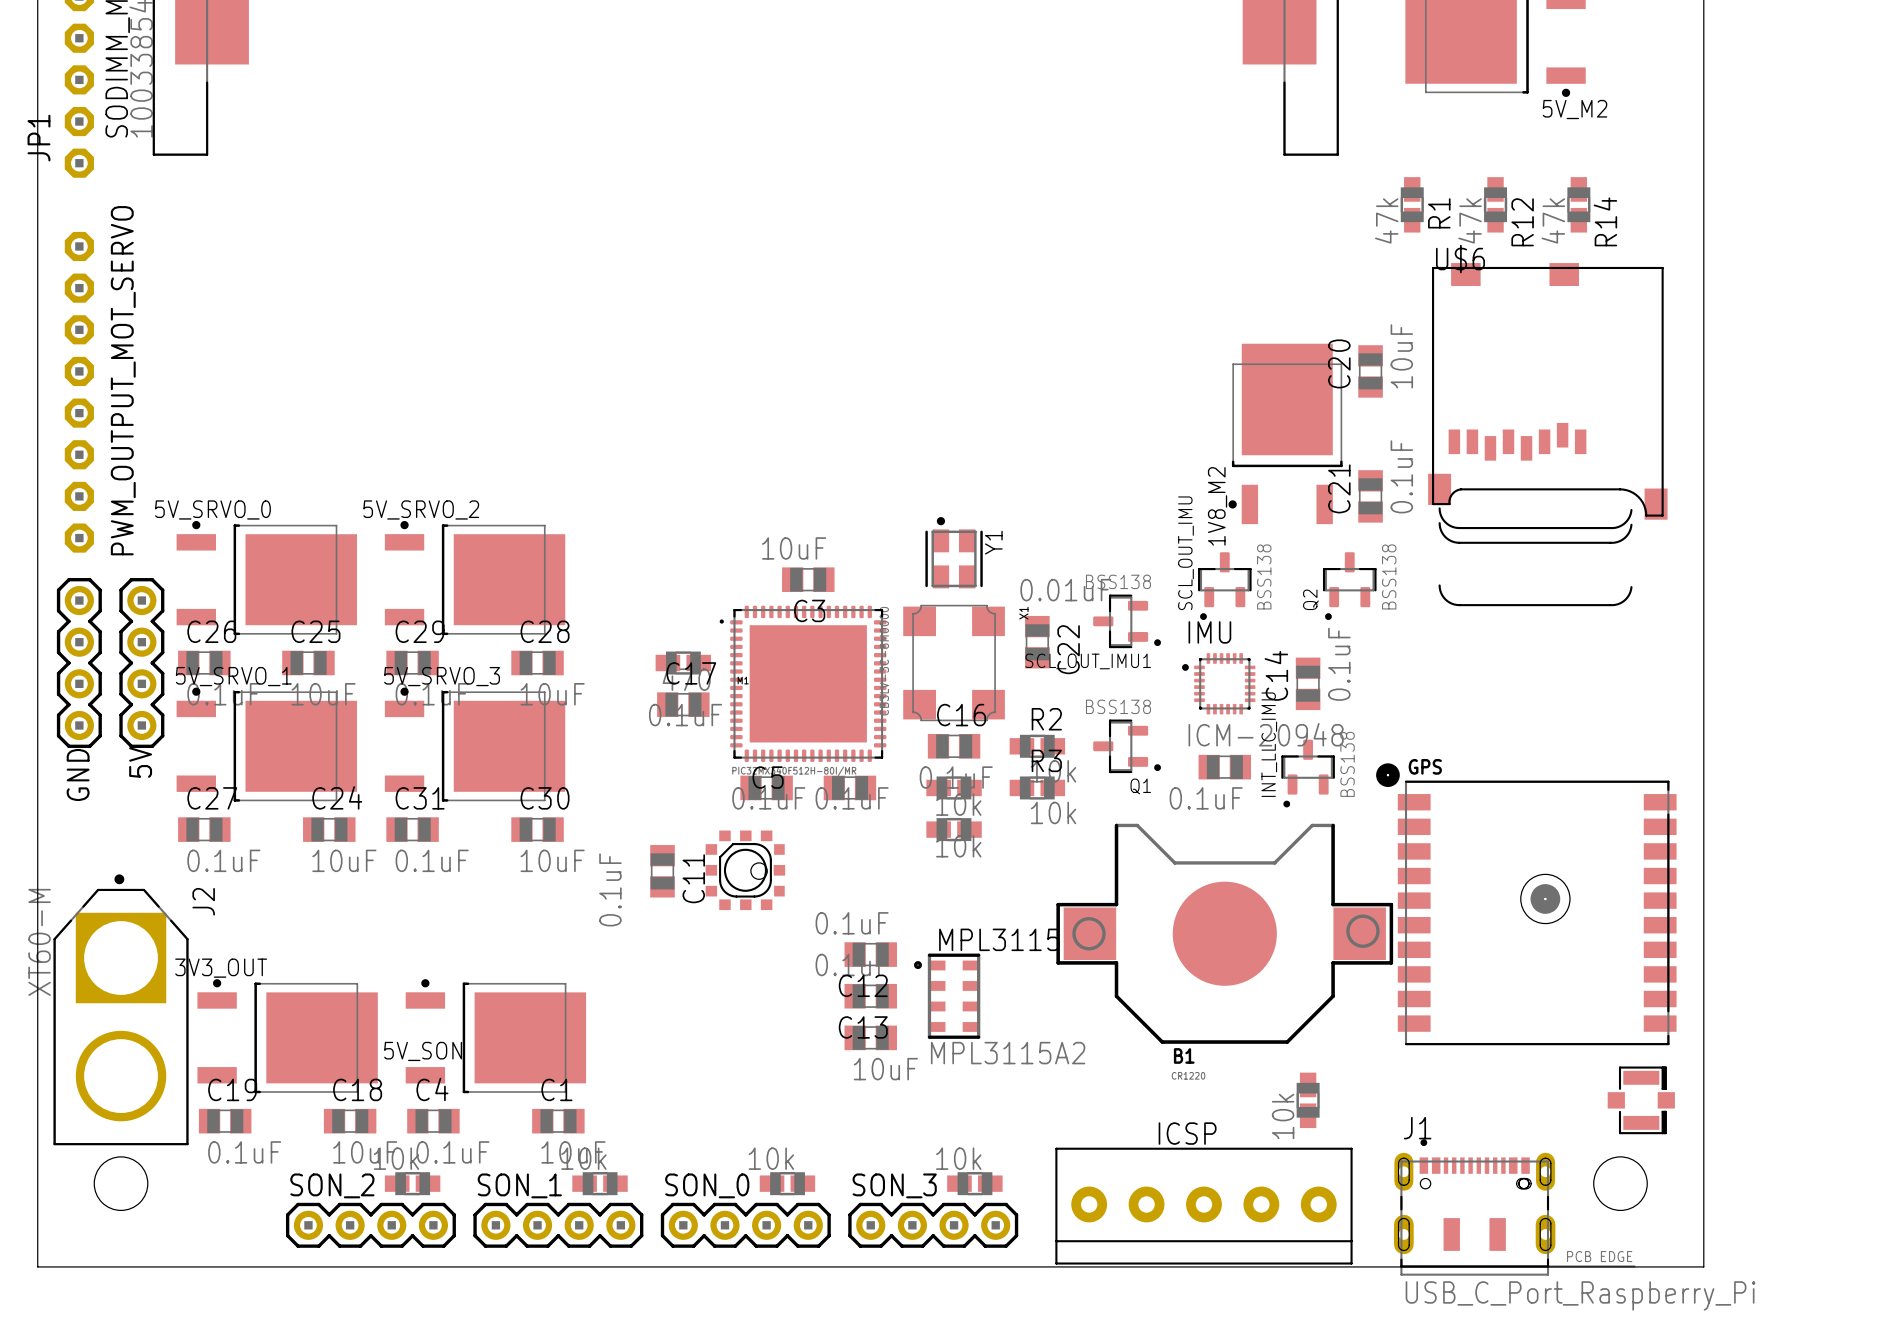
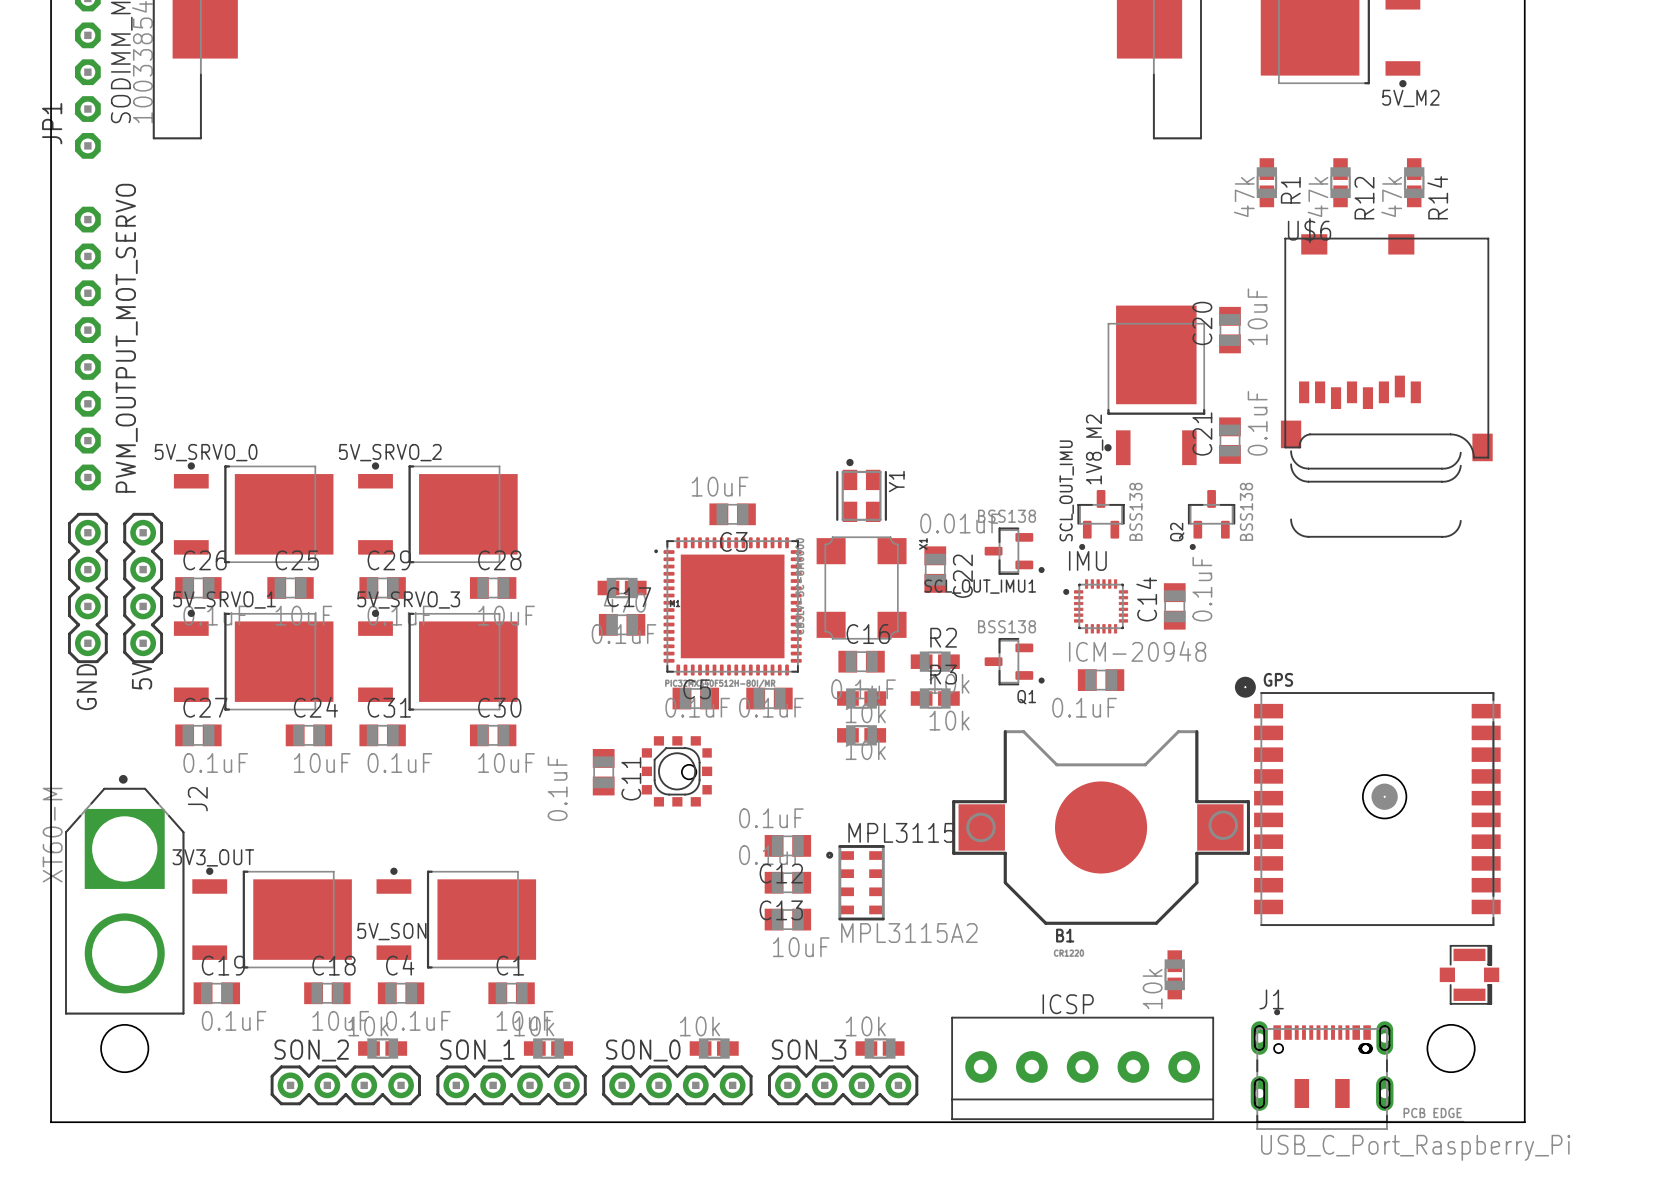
INT_LLC_IMU: BSS138 (1308, 773) -> none

